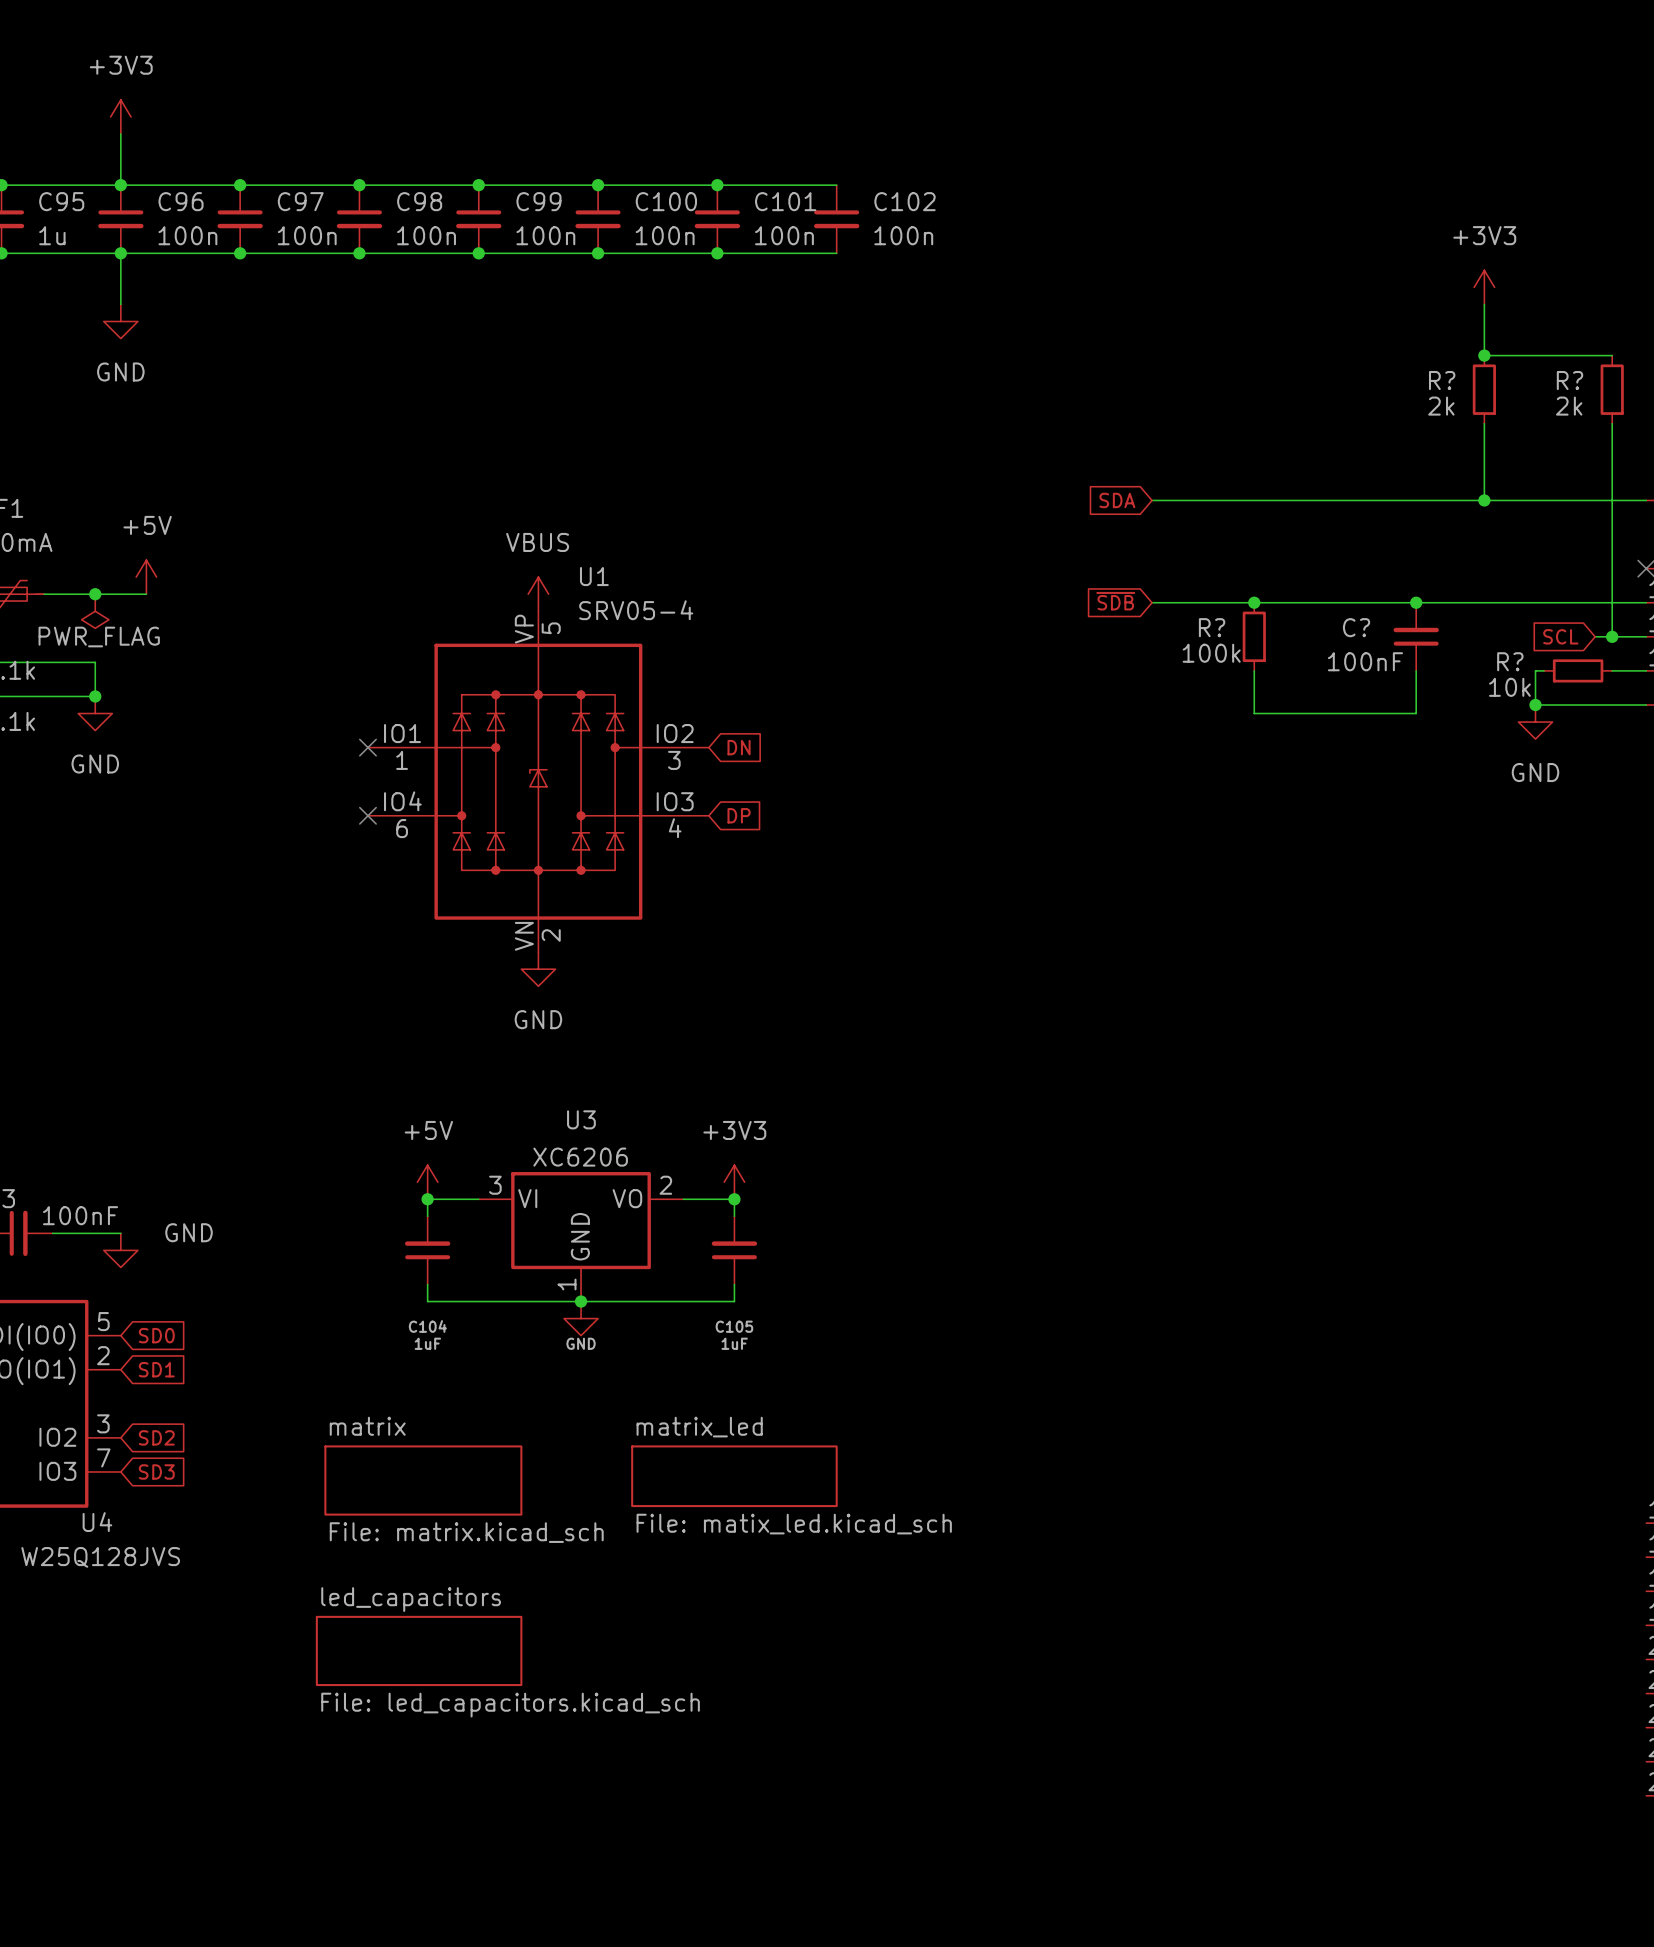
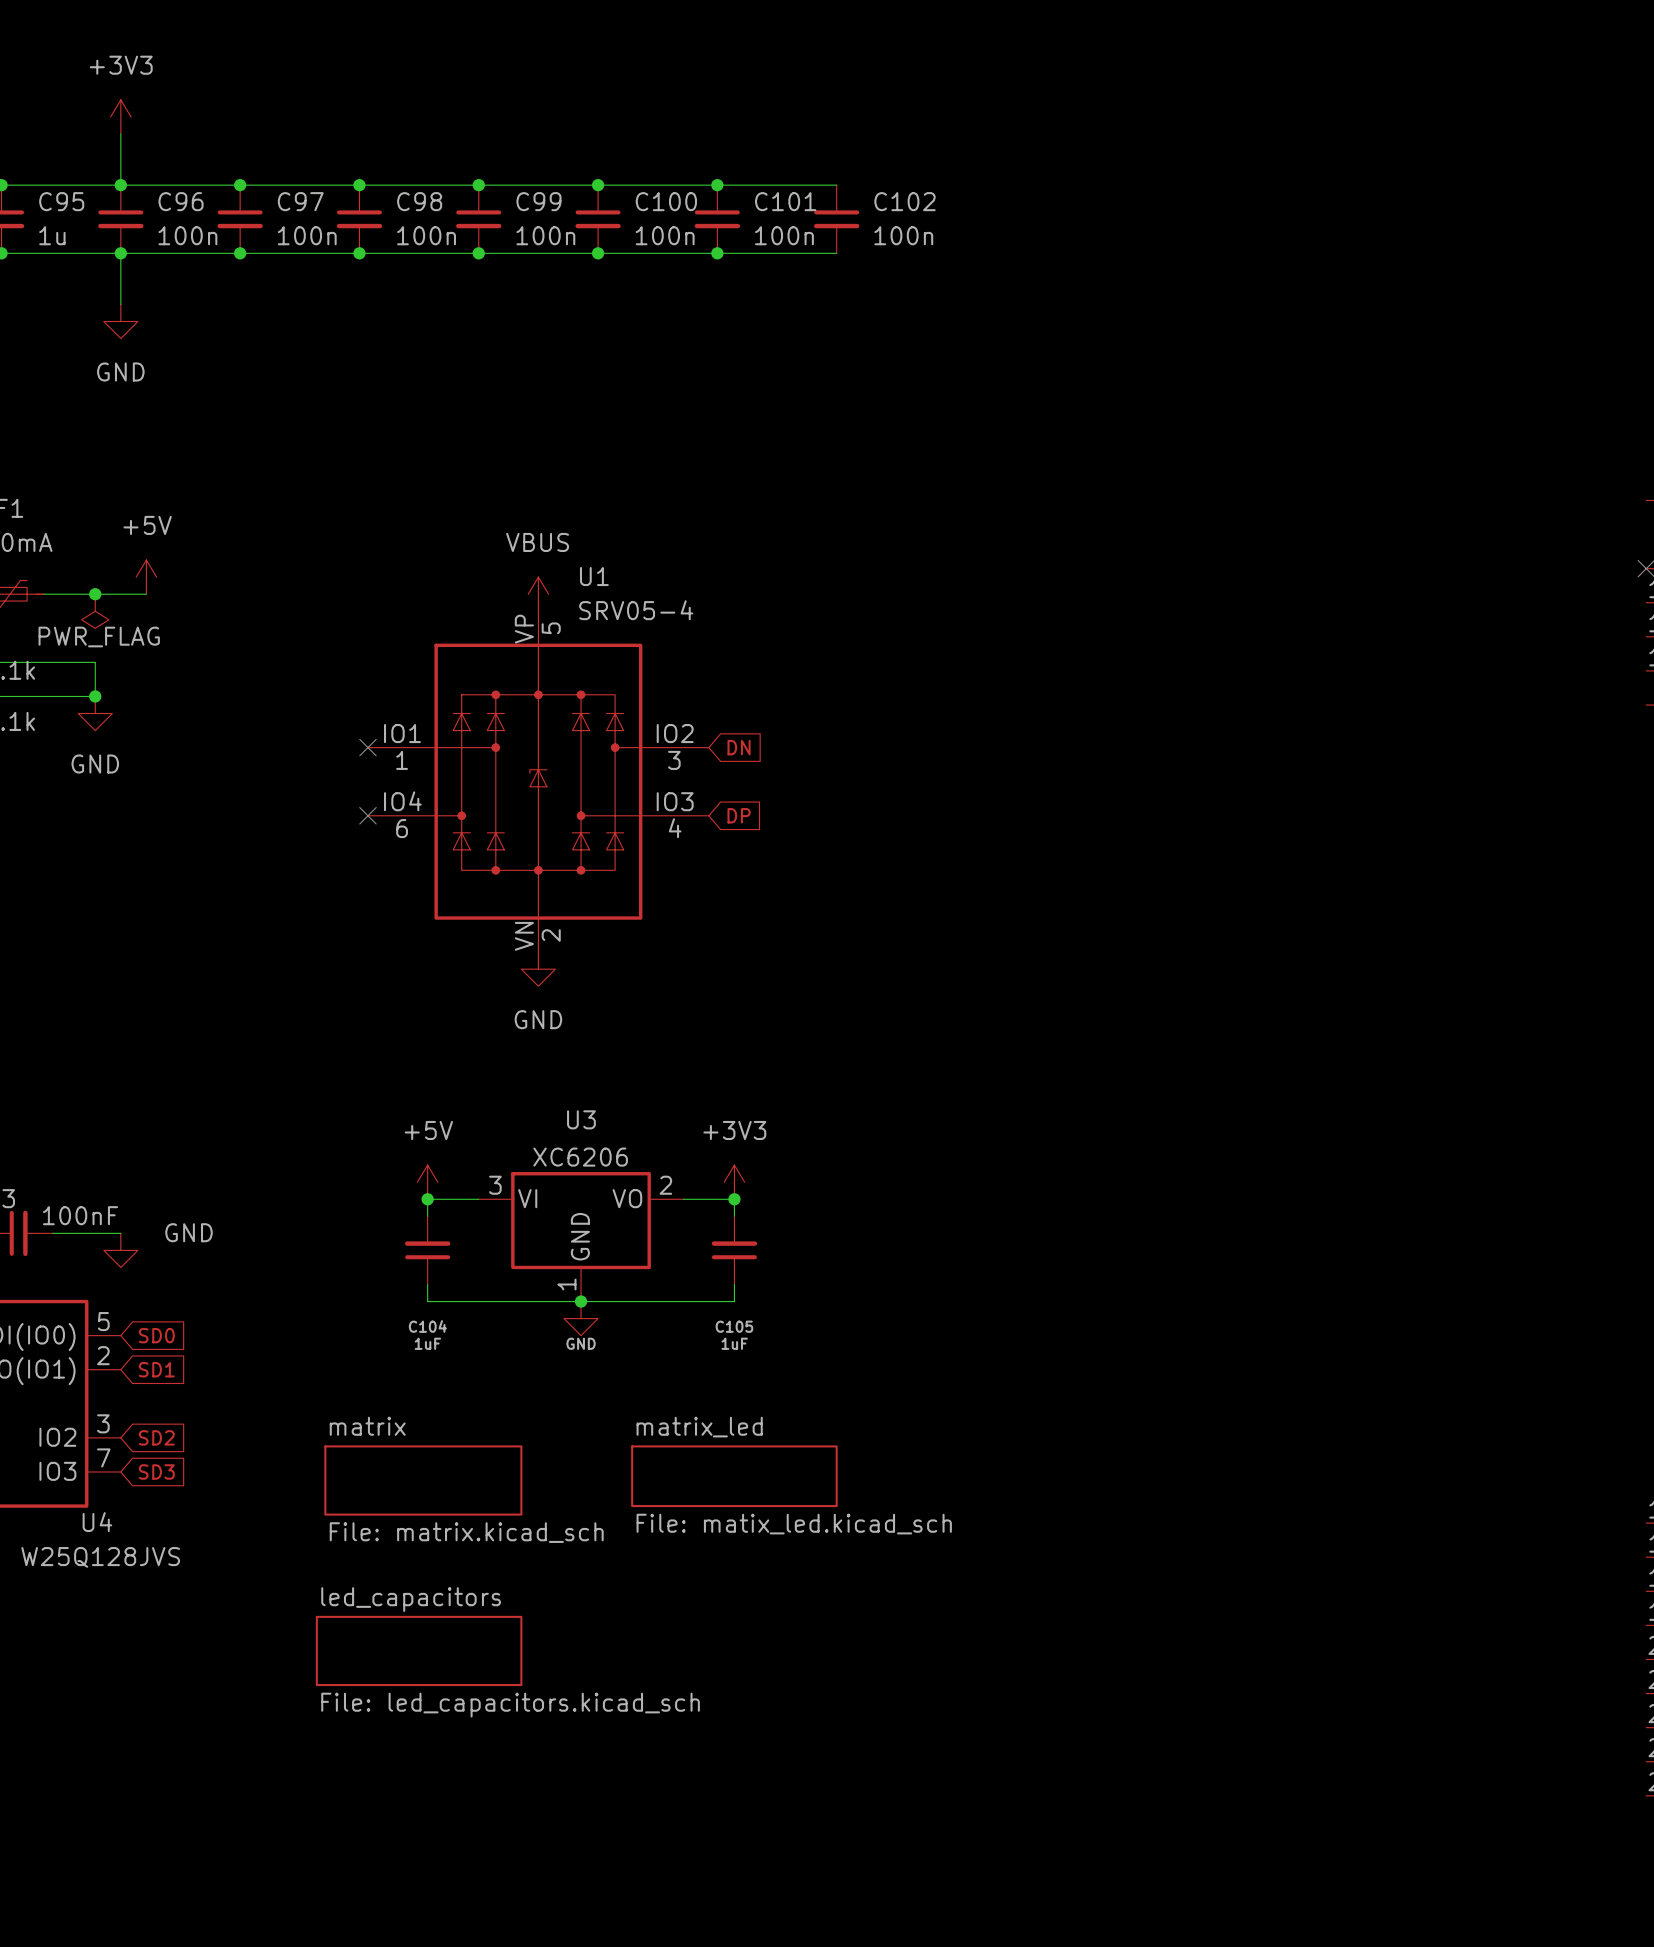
power symbol: +3V3 (1484, 287) -> none
wire: (1484, 304) (1484, 355) (1612, 355) -> none
junction: (1484, 355) -> none
R?: 2k (1484, 389) -> none
R?: 2k (1612, 389) -> none
wire: (1484, 423) (1484, 500) -> none
wire: (1612, 423) (1612, 636) -> none
global label: SDA (1117, 500) -> none
wire: (1152, 500) (1646, 500) -> none
junction: (1484, 500) -> none
global label: ~{SDB} (1115, 601) -> none
wire: (1152, 602) (1646, 602) -> none
junction: (1254, 602) -> none
junction: (1416, 602) -> none
R?: 100k (1254, 636) -> none
C?: 100nF (1416, 636) -> none
global label: SCL (1560, 636) -> none
wire: (1595, 636) (1646, 636) -> none
junction: (1612, 636) -> none
wire: (1254, 670) (1254, 713) (1416, 713) (1416, 670) -> none
wire: (1544, 670) (1535, 670) (1535, 705) (1646, 705) -> none
R?: 10k (1578, 670) -> none
wire: (1612, 670) (1646, 670) -> none
junction: (1535, 705) -> none
power symbol: GND (1535, 722) -> none

